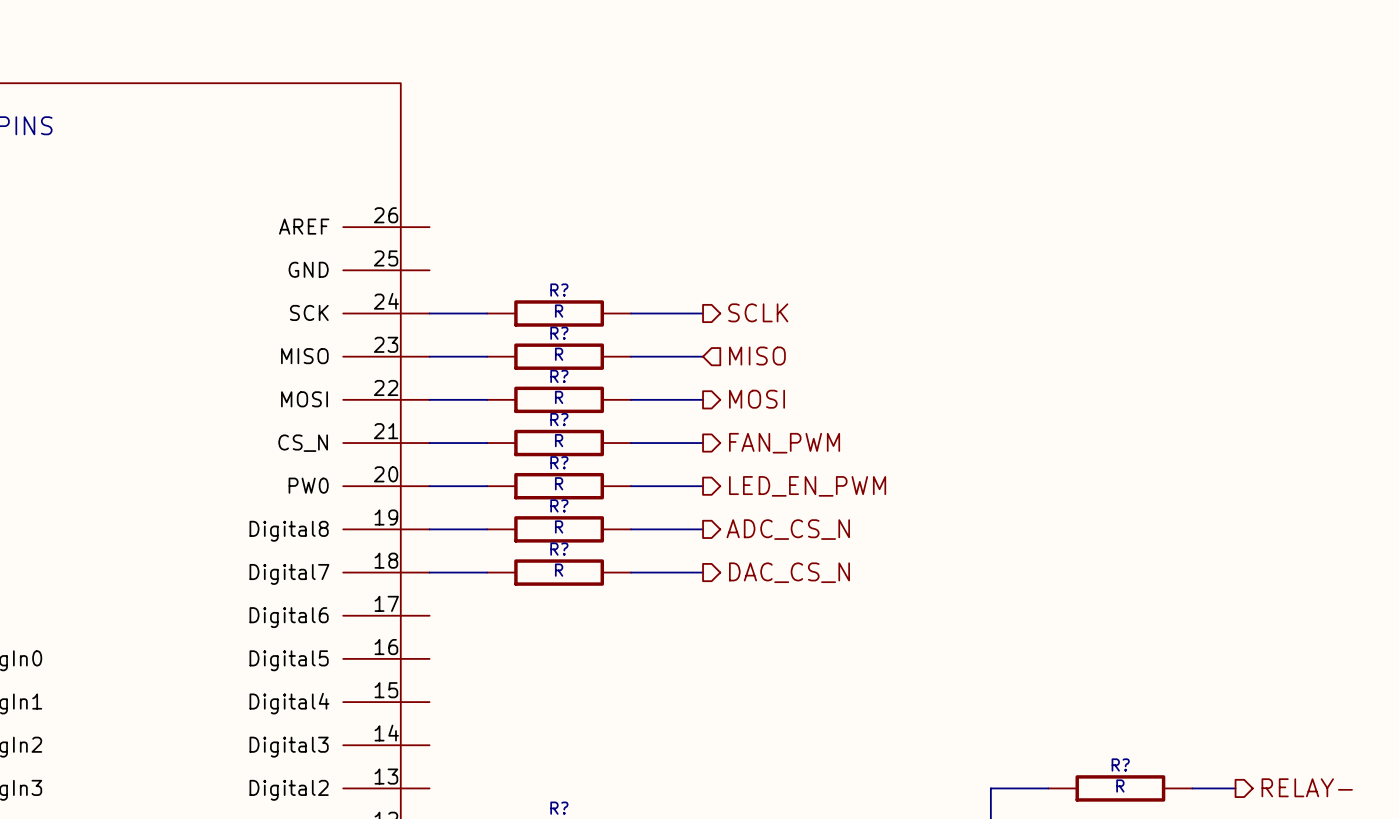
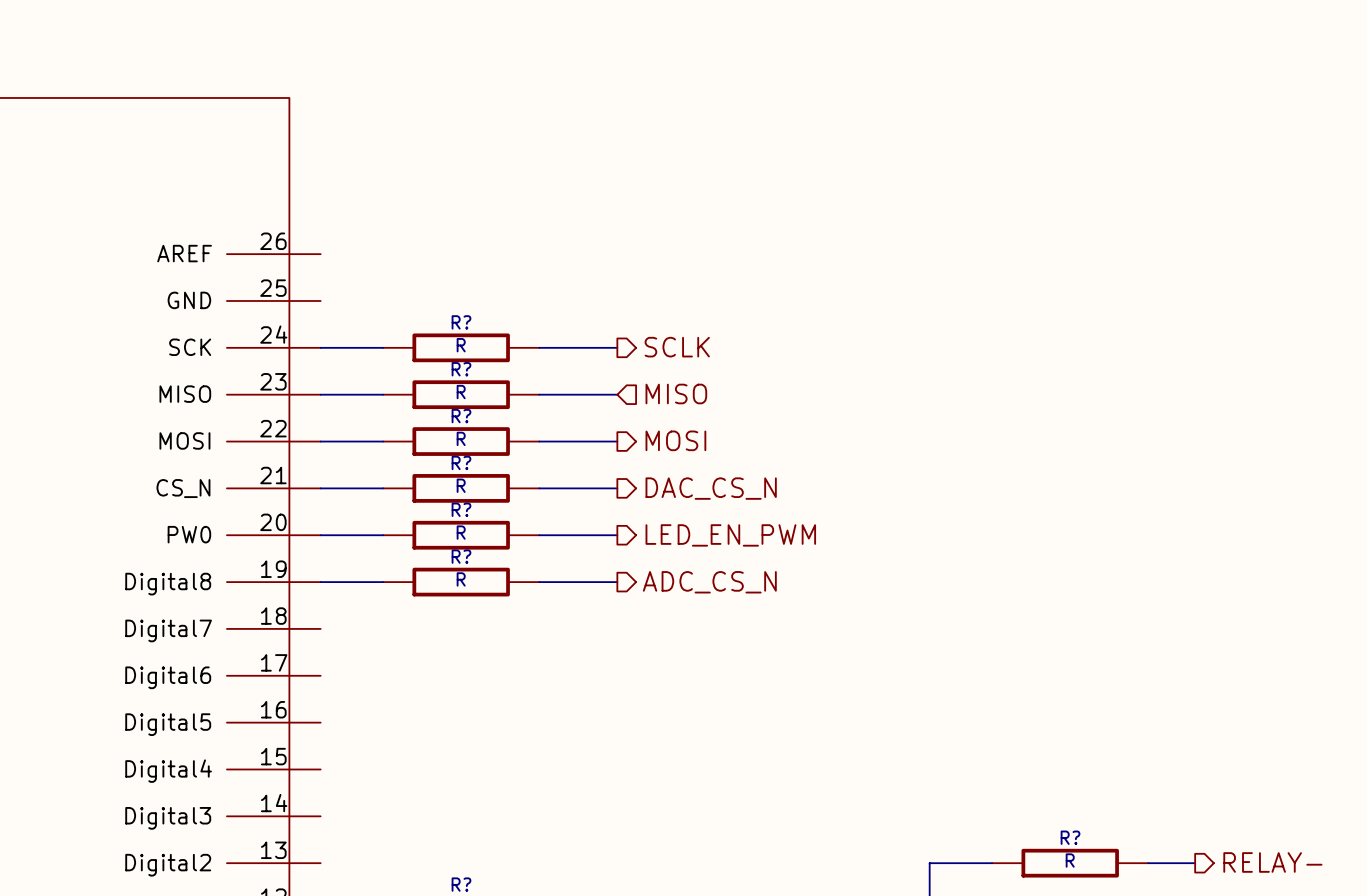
hierarchical label: FAN_PWM (784, 443) -> DAC_CS_N (711, 488)
wire: (429, 572) (487, 572) -> none
R?: R (559, 572) -> none
wire: (631, 572) (703, 572) -> none
hierarchical label: DAC_CS_N (789, 572) -> none

